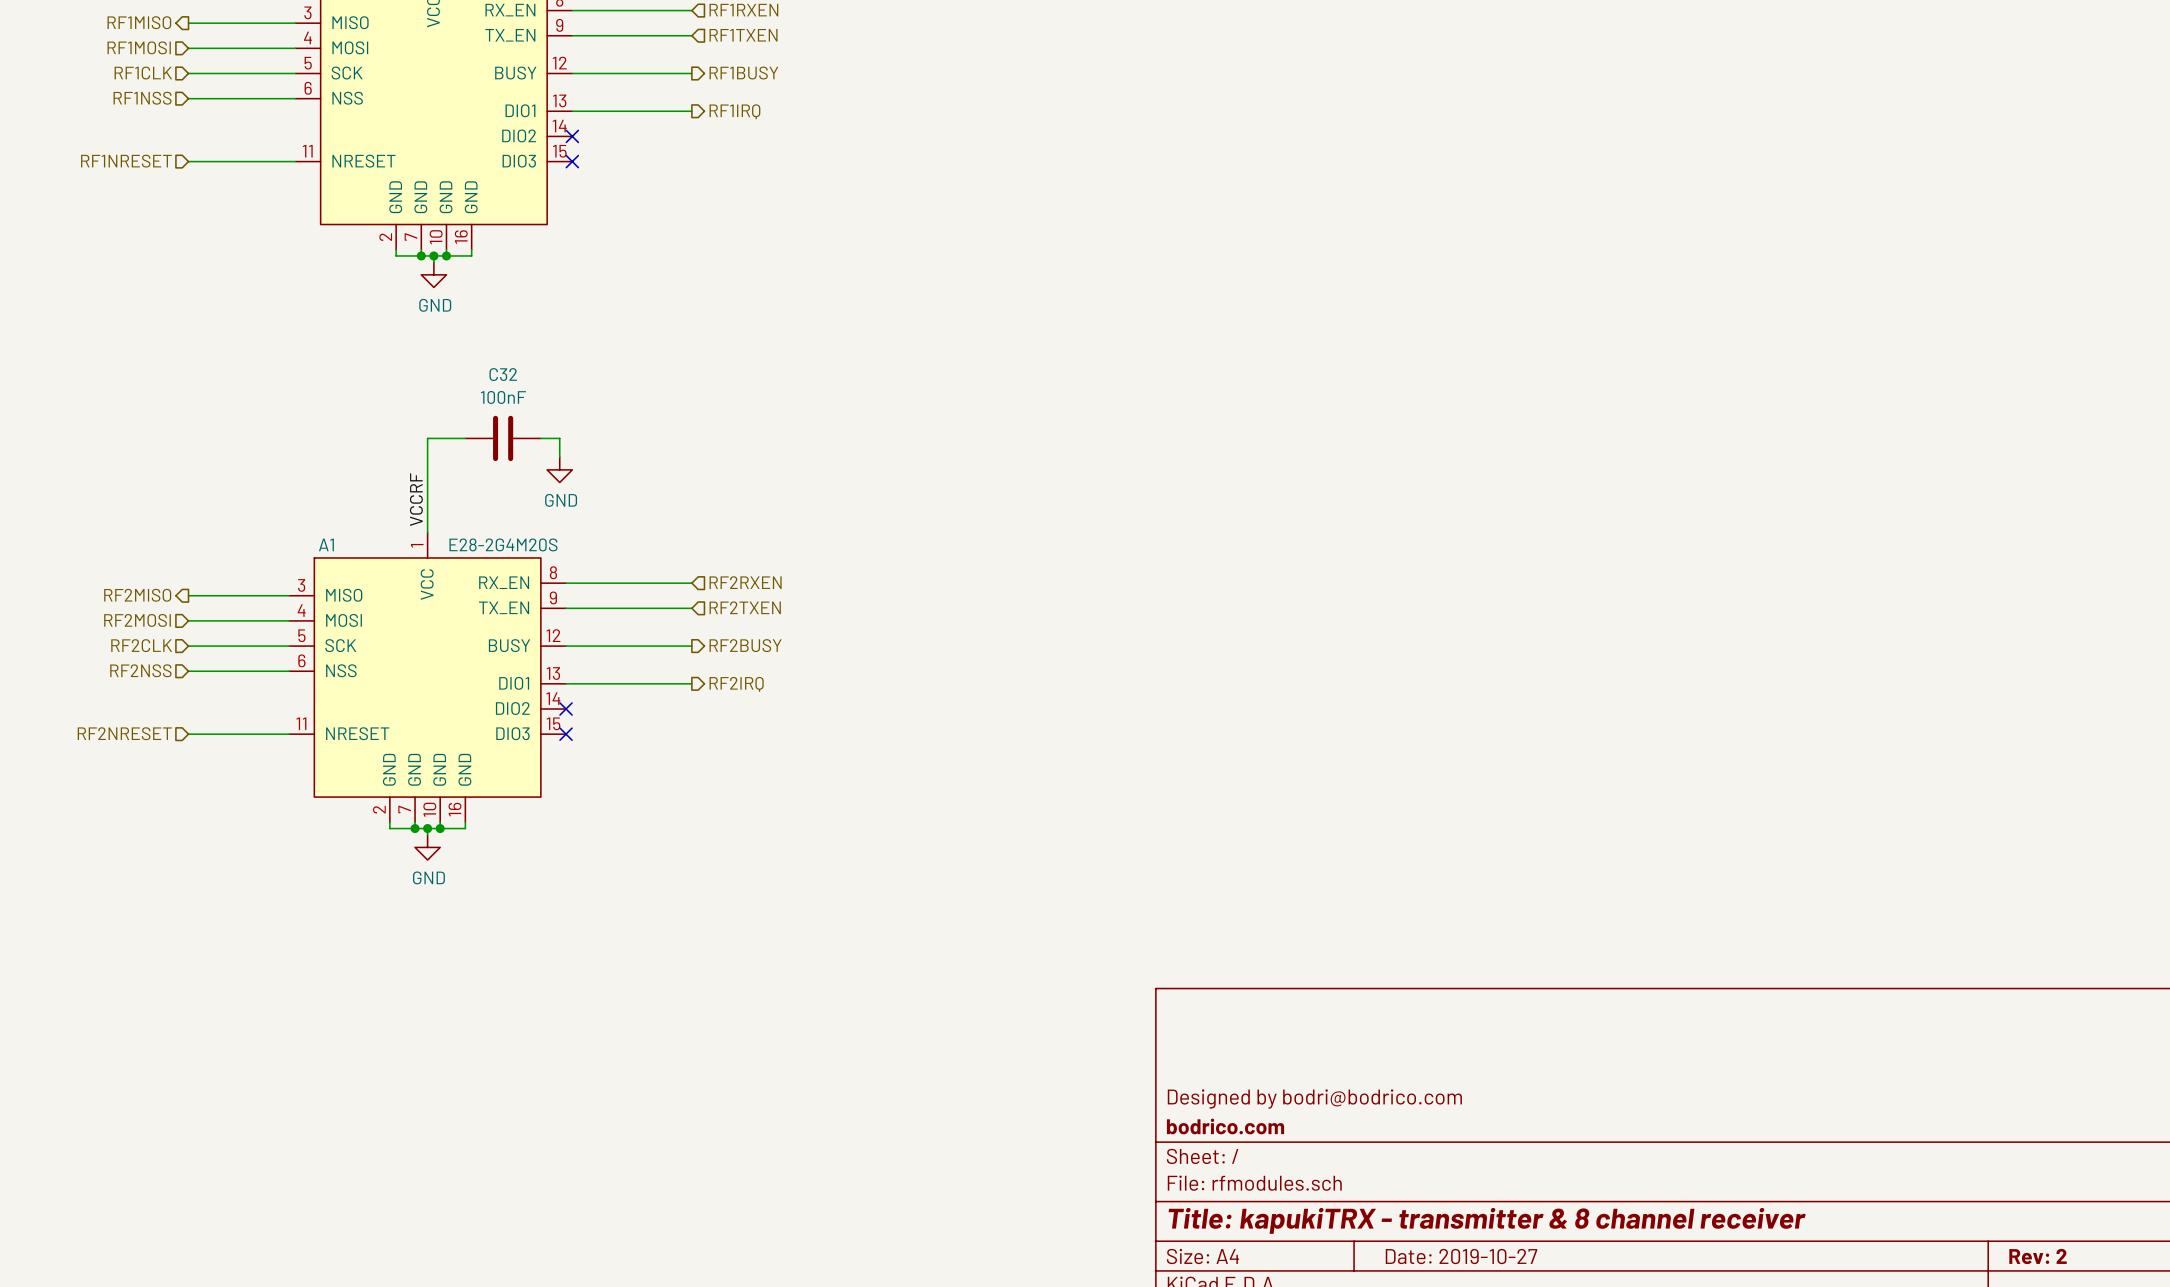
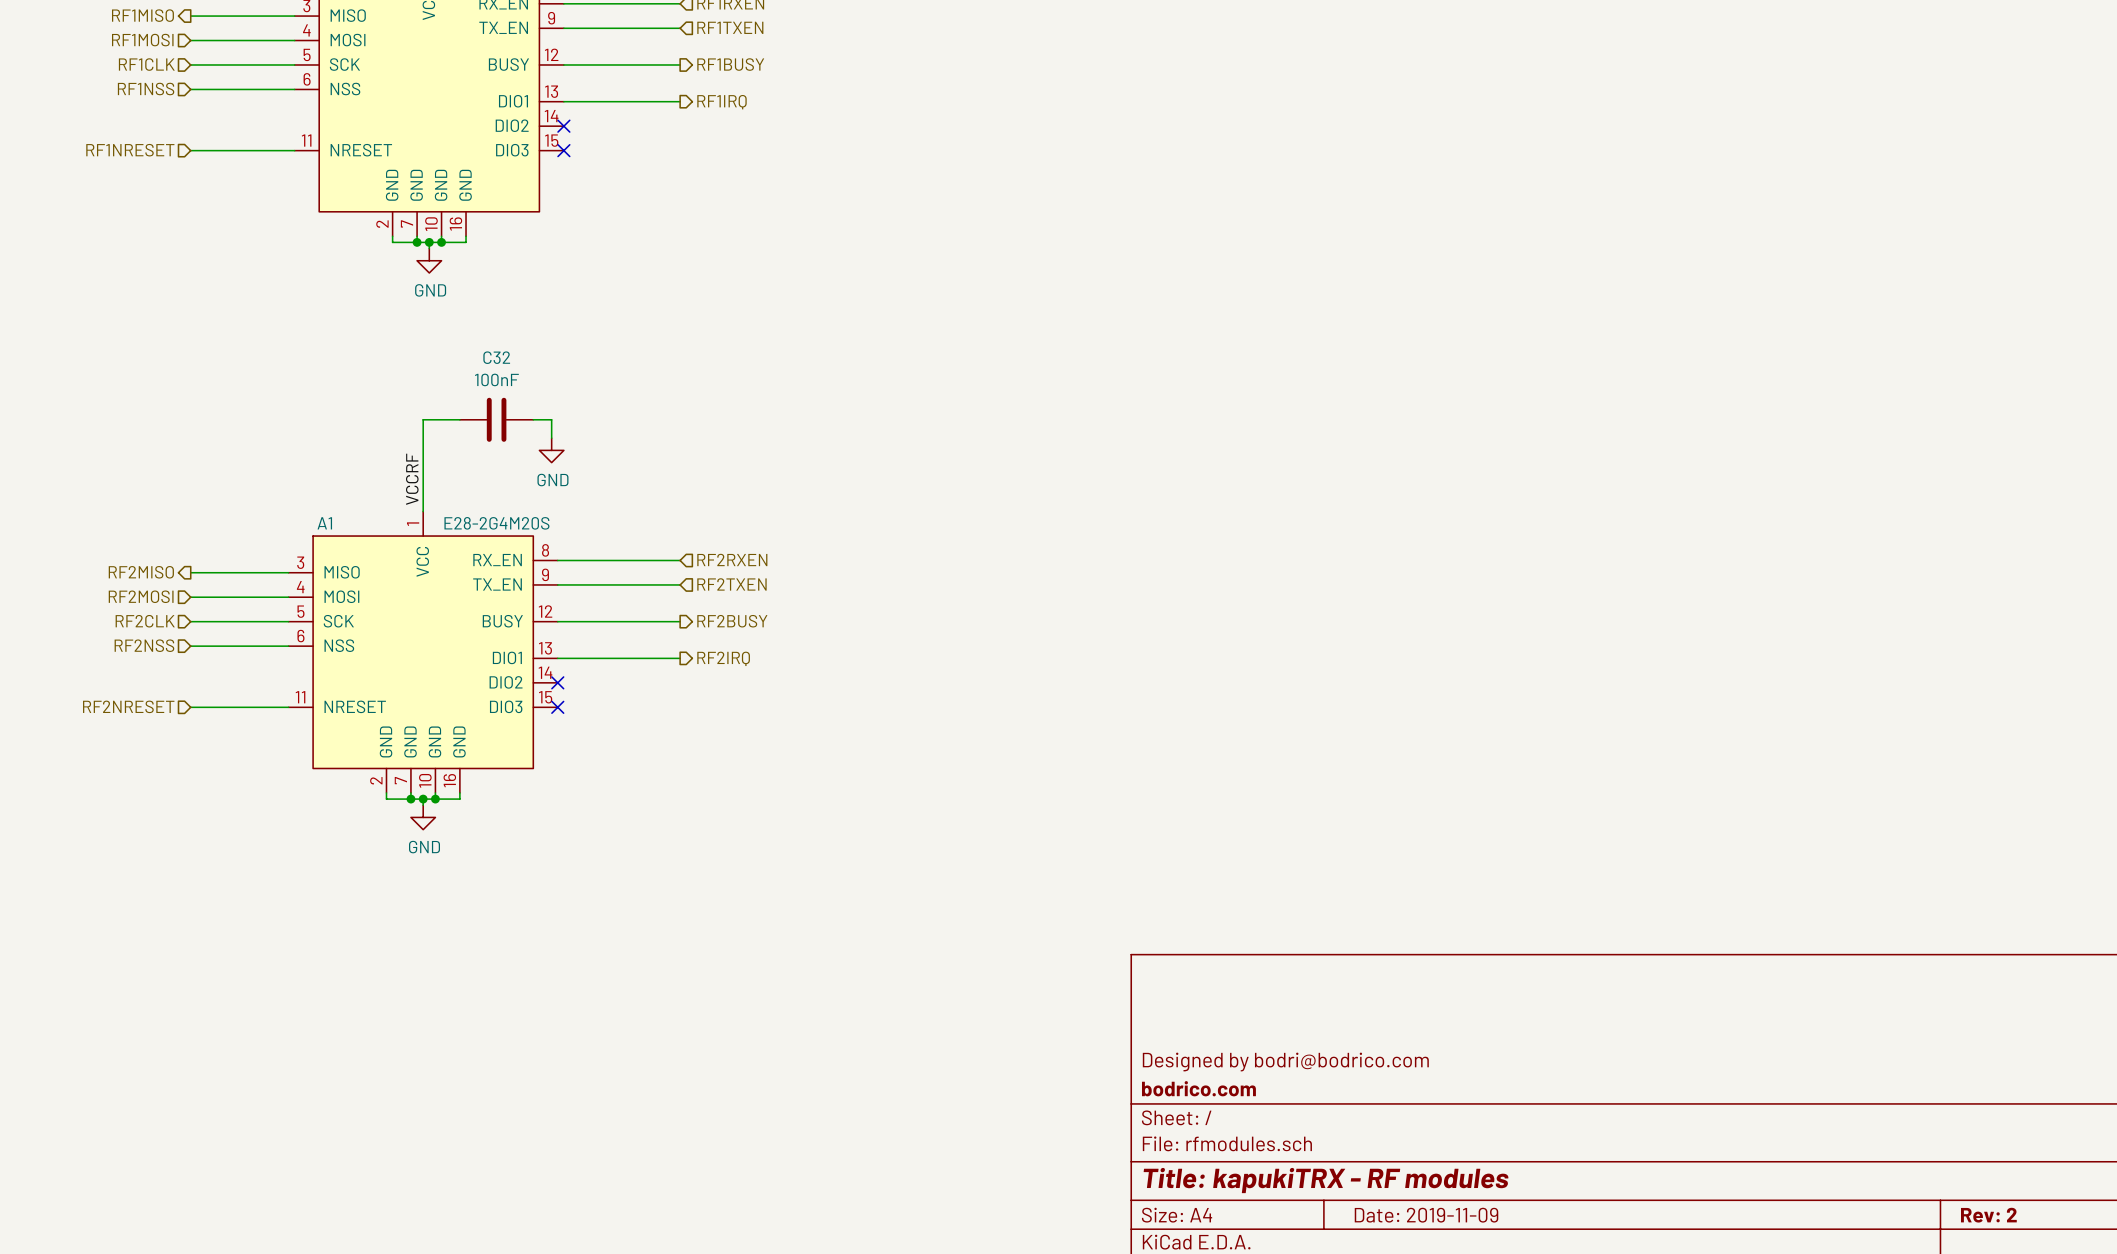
title block: Title: kapukiTRX - transmitter & 8 channel receiver (1487, 1220) -> Title: kapukiTRX - RF modules (1326, 1180)
title block: Date: 2019-10-27 (1461, 1256) -> Date: 2019-11-09 (1426, 1215)

